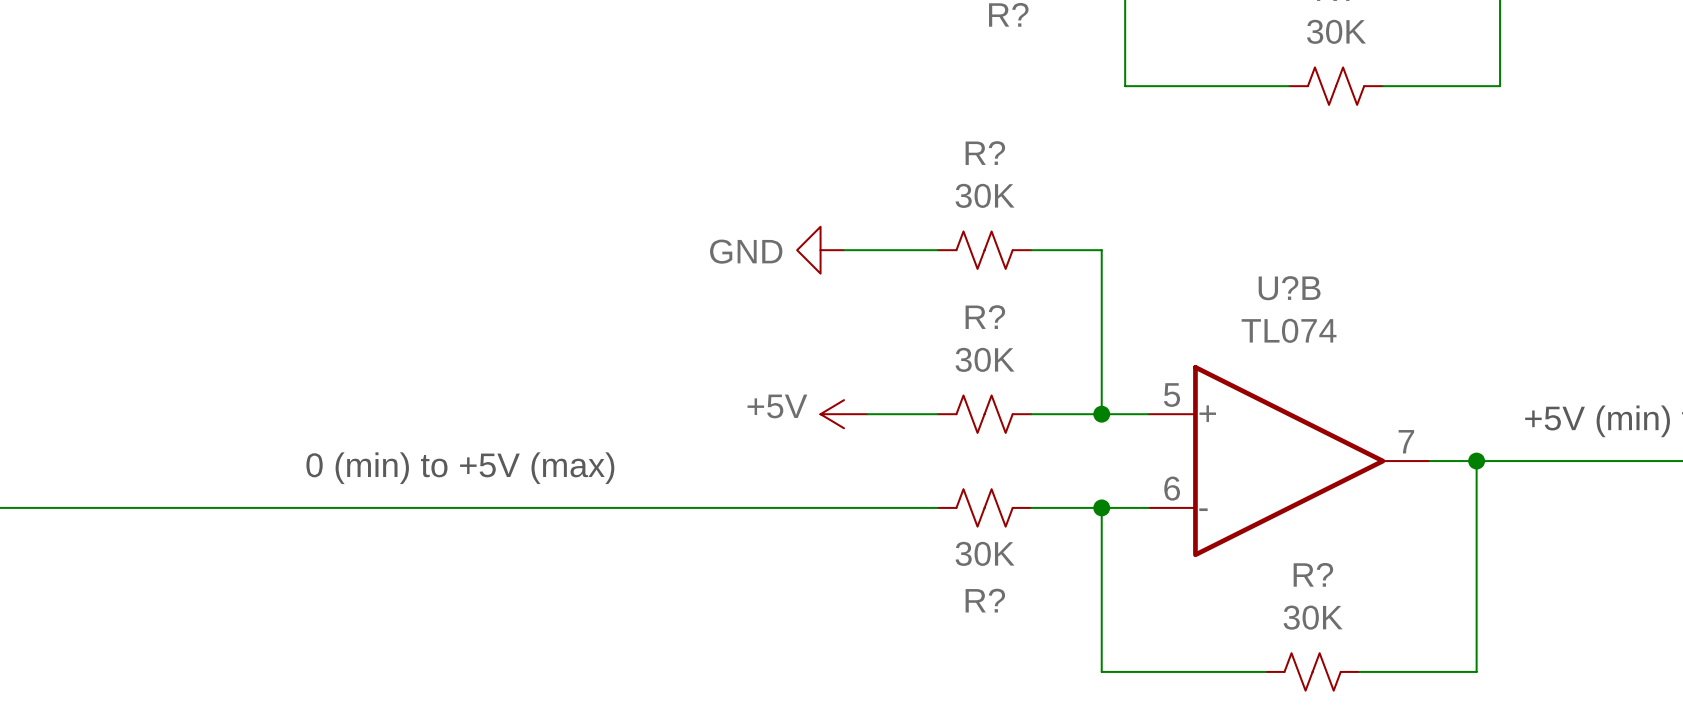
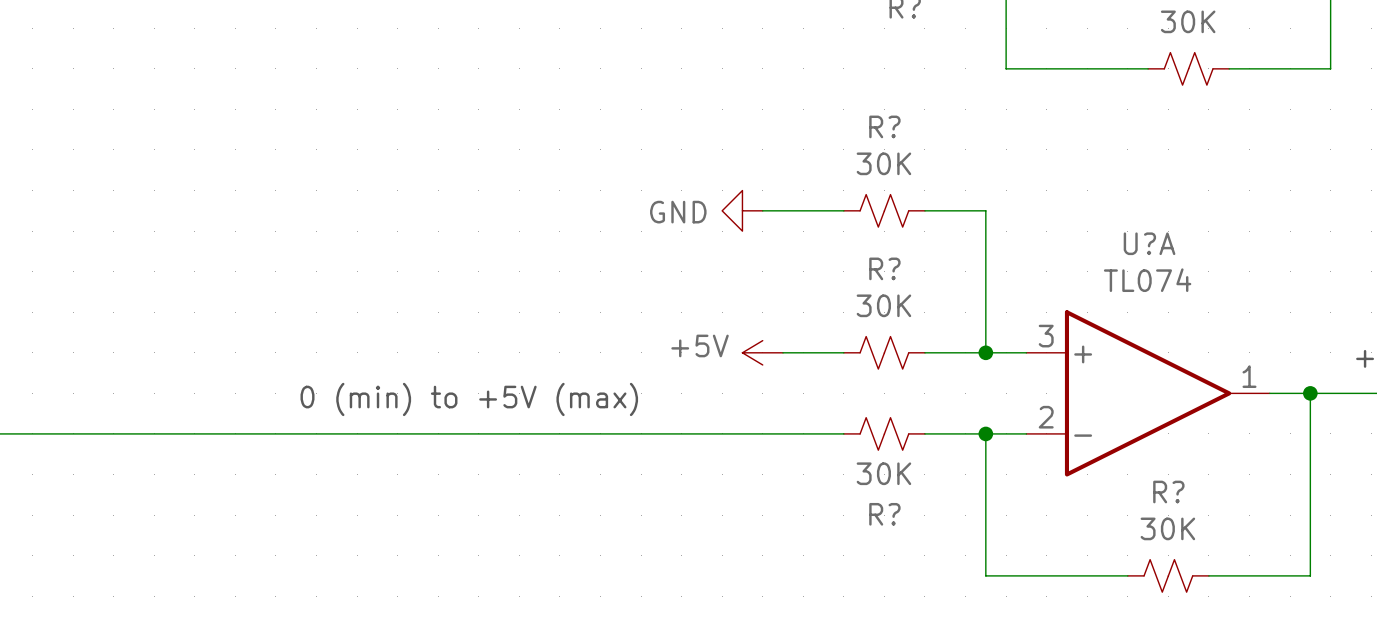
U?B name: U?B (1289, 288) -> U?A (1149, 243)
U?B pin number: 5 (1171, 395) -> 3 (1046, 336)
U?B pin number: 7 (1406, 441) -> 1 (1249, 376)
U?B pin number: 6 (1172, 488) -> 2 (1046, 417)

